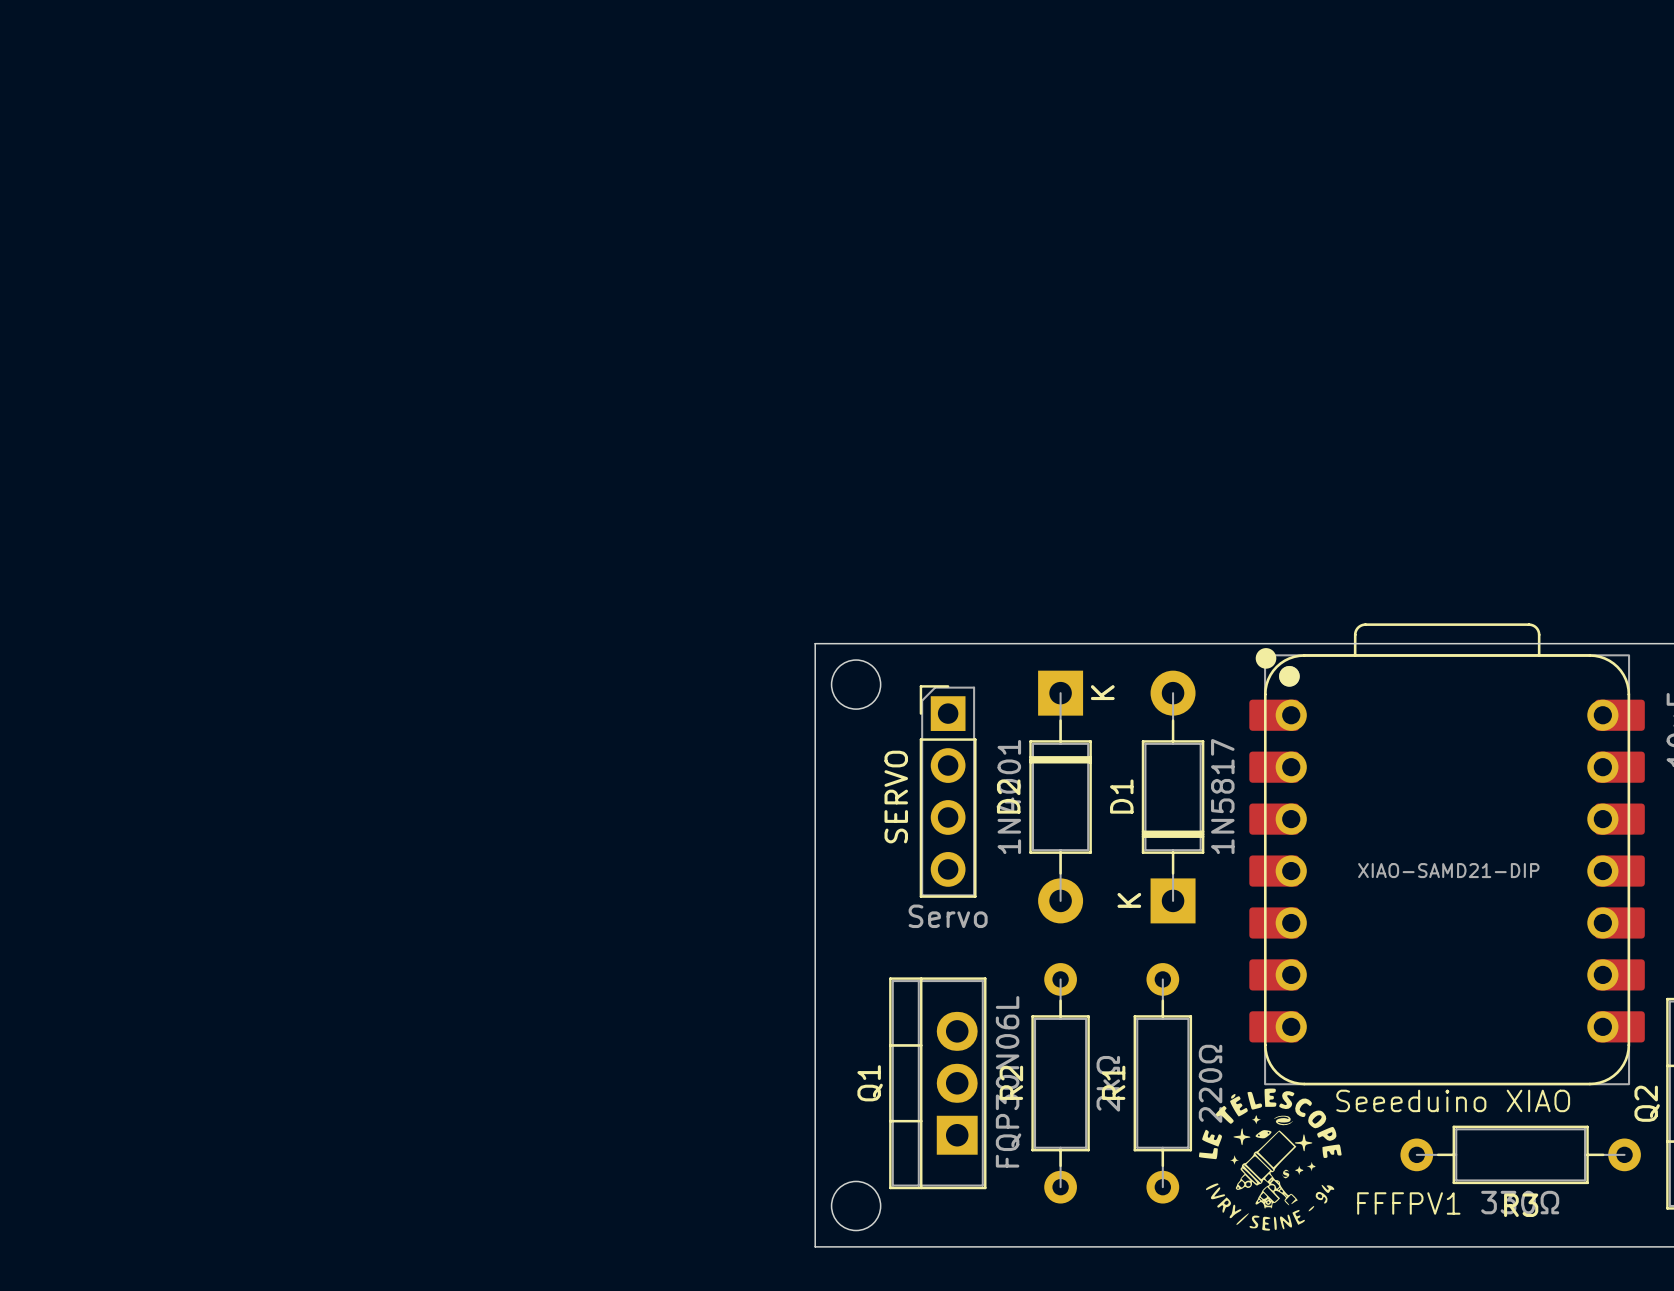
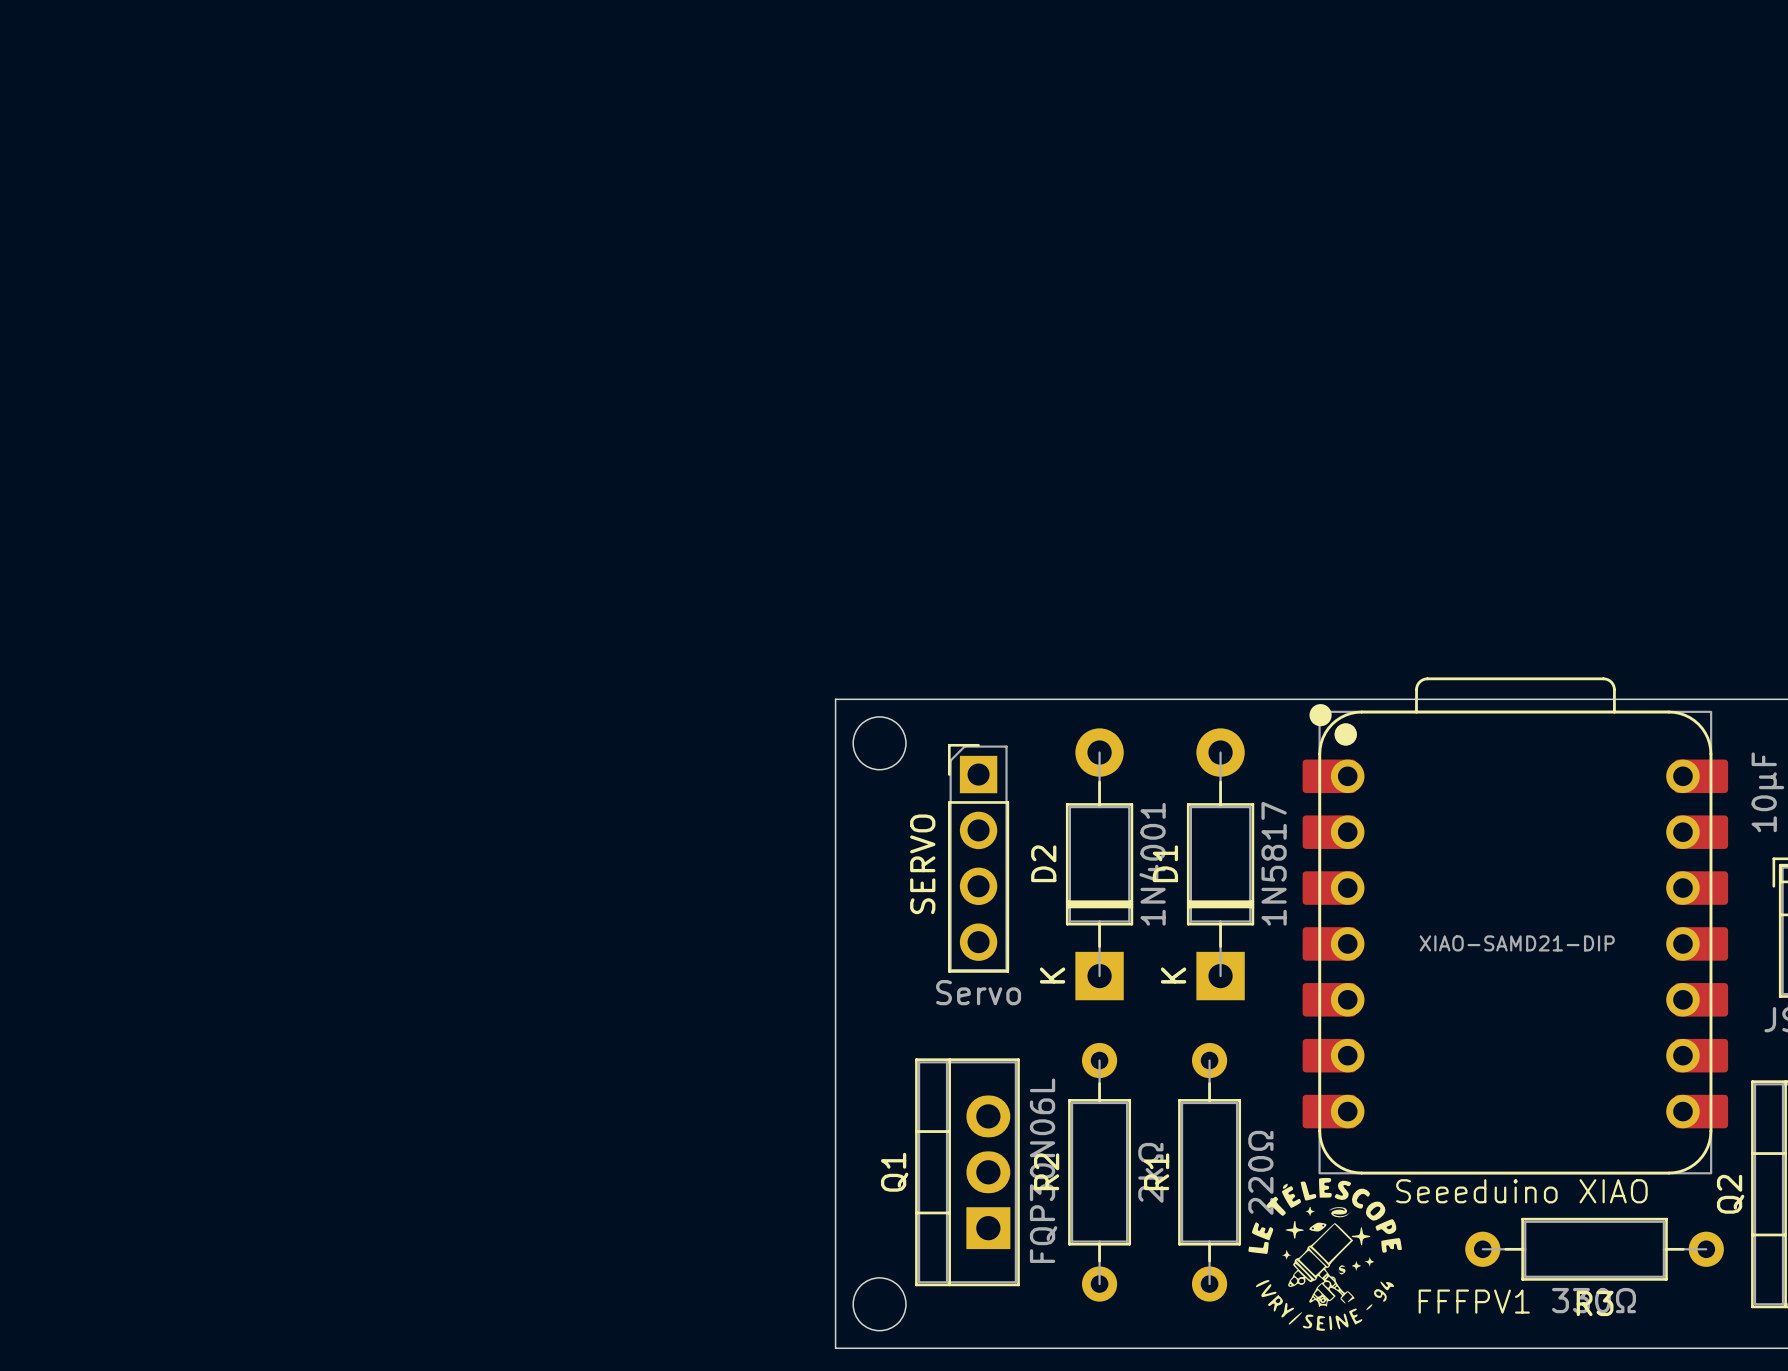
D2 rotation: 0° (1060, 797) -> 180° (1099, 864)

